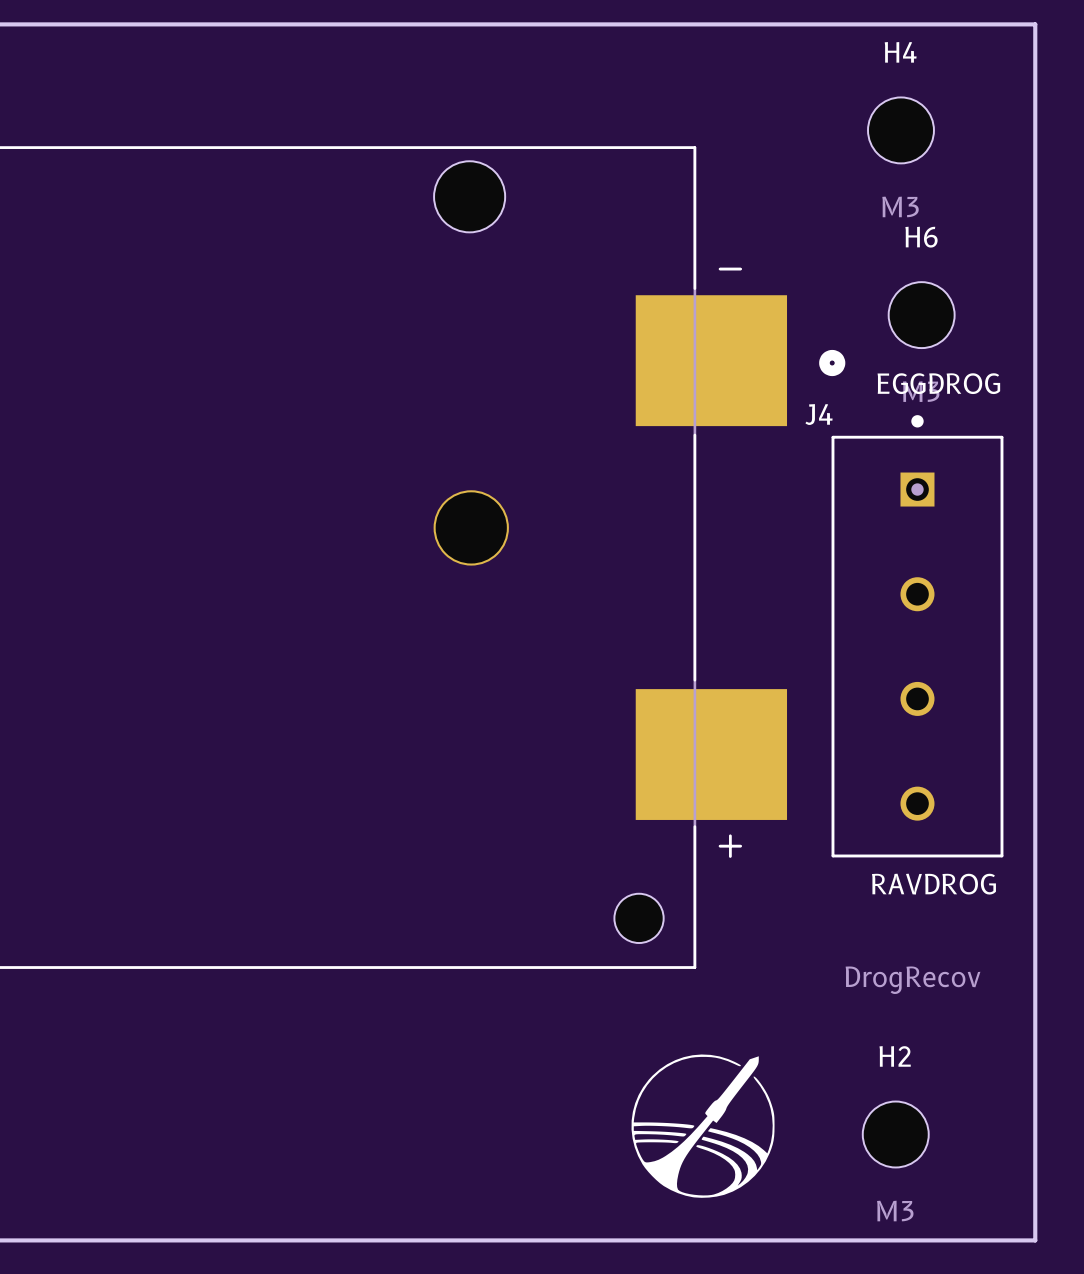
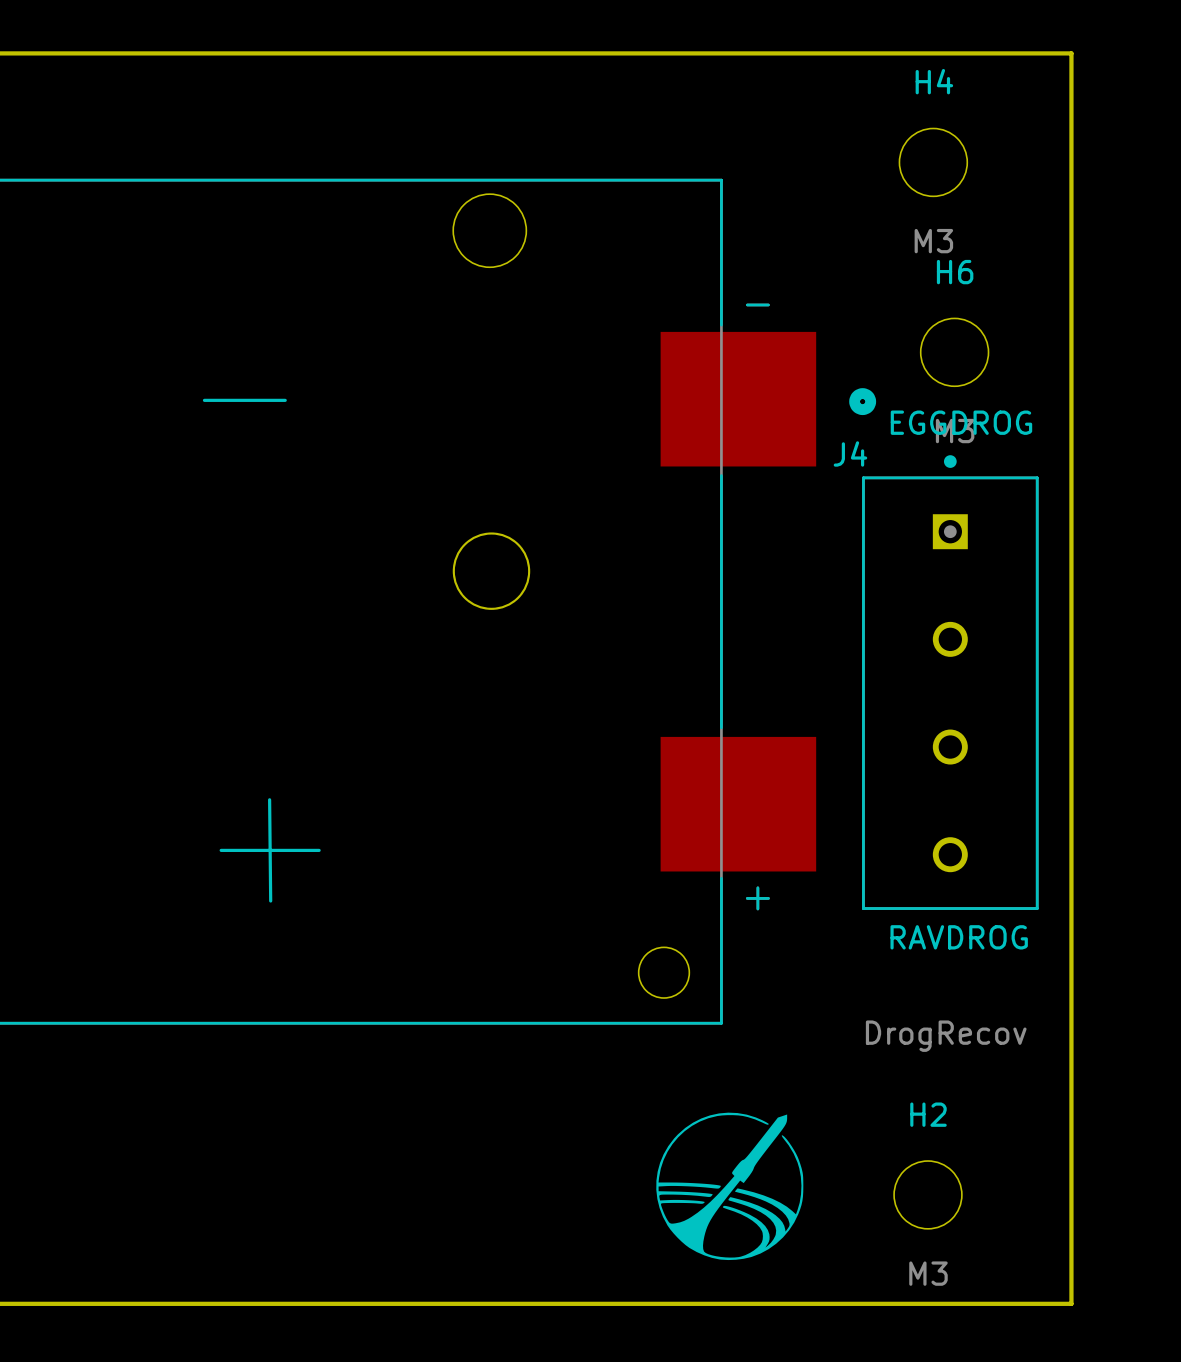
line: none -> (204, 400) (285, 400)
line: none -> (269, 799) (270, 901)
line: none -> (221, 850) (319, 850)

